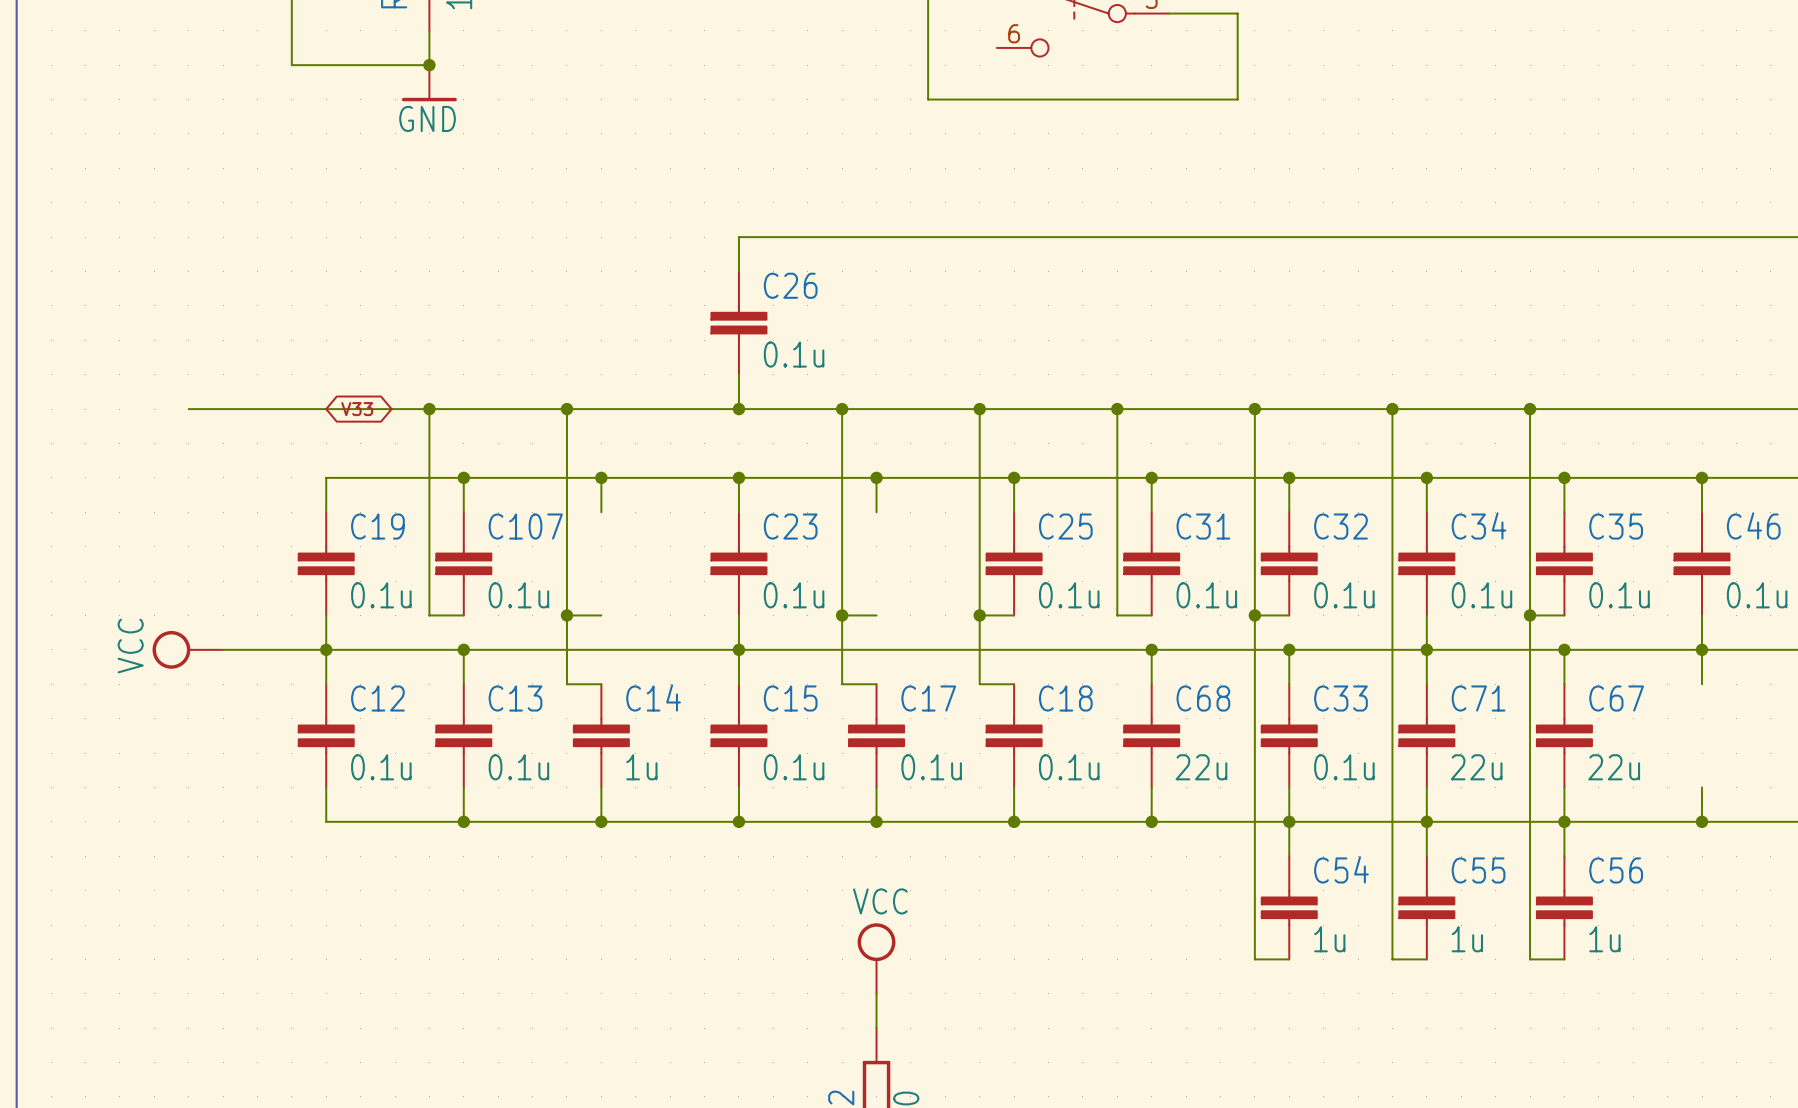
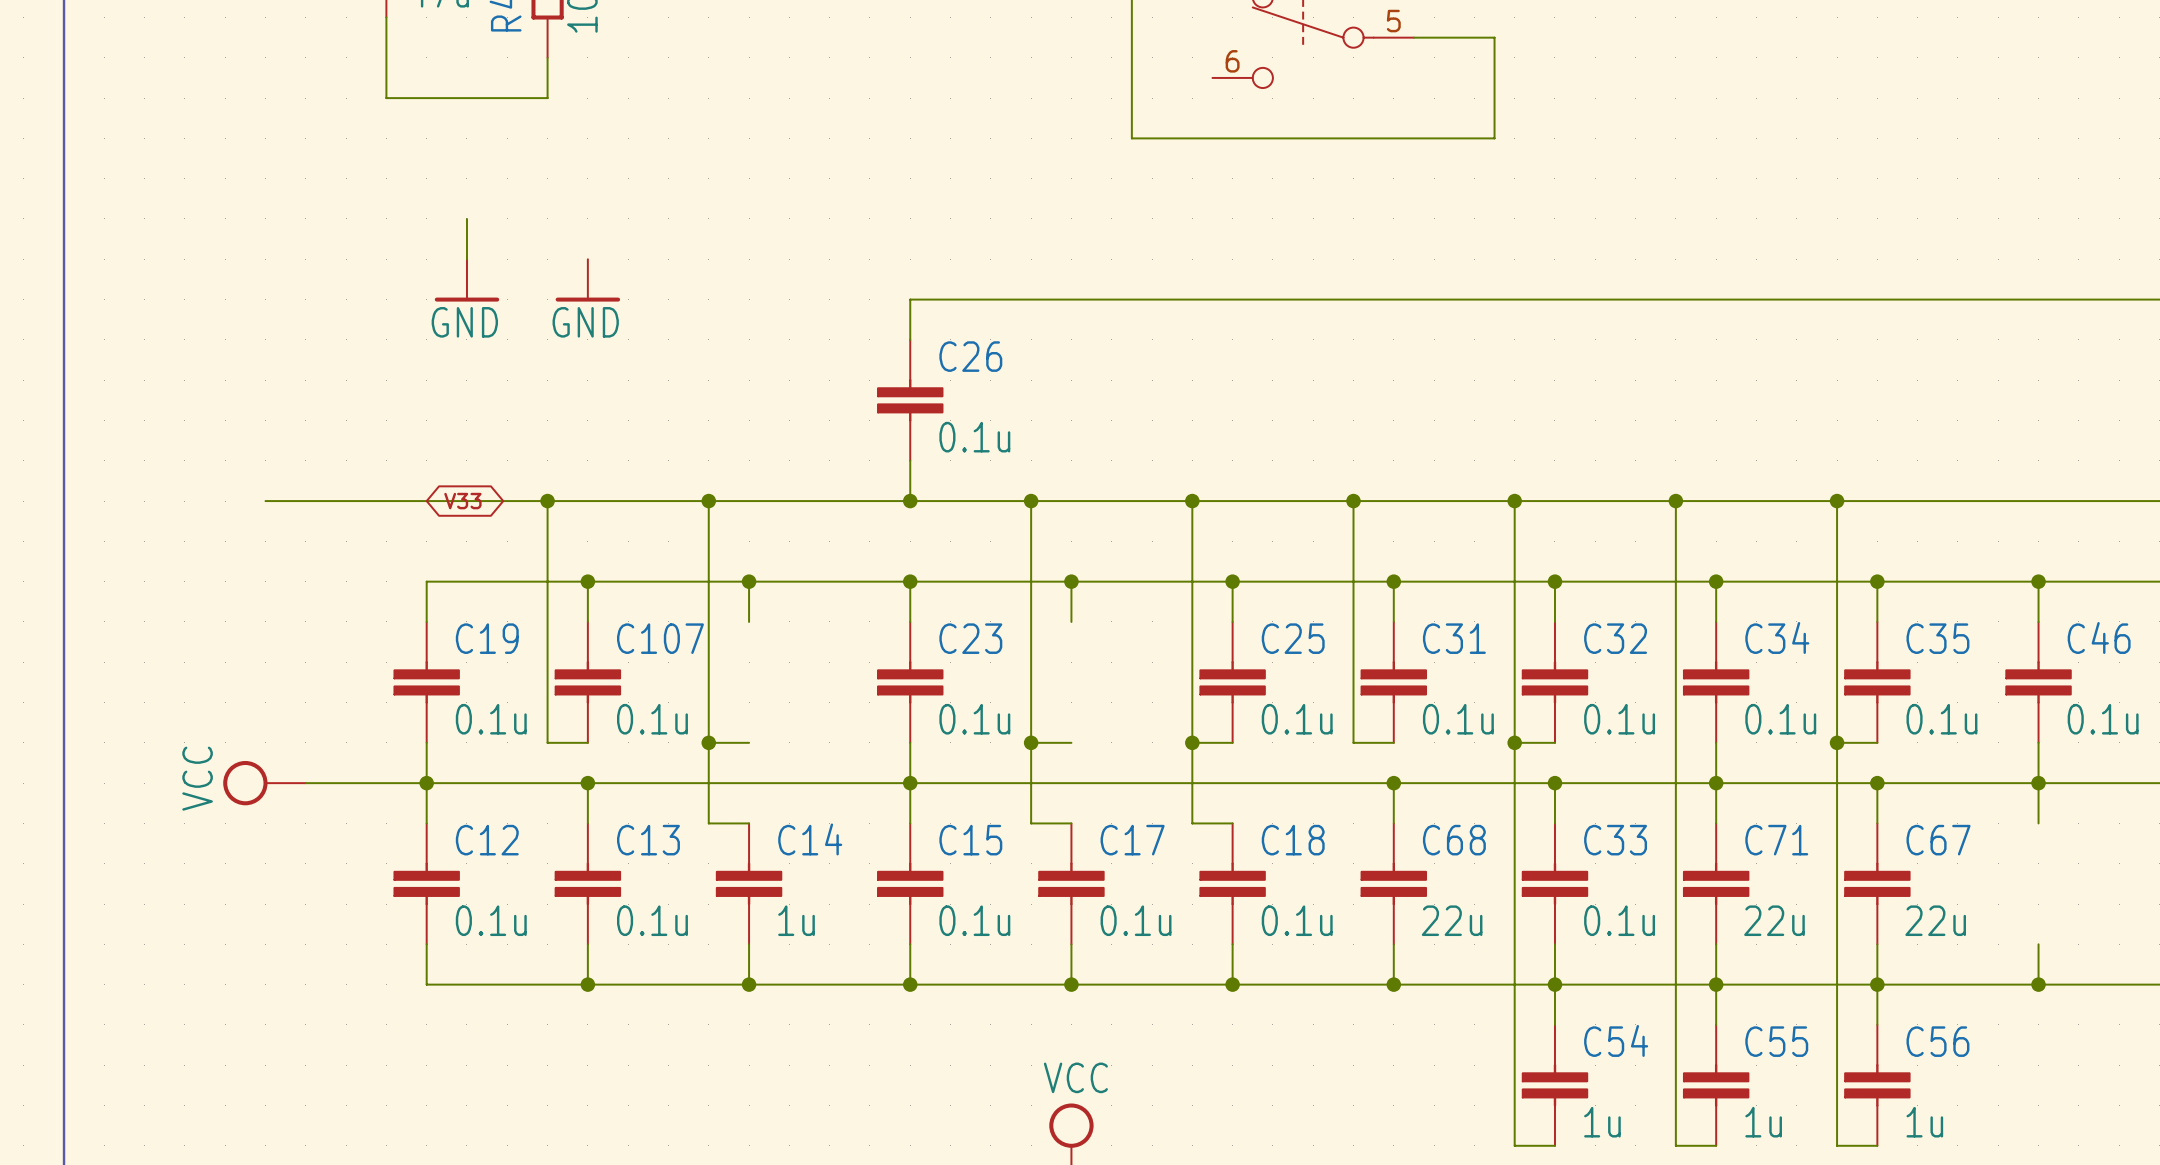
junction: (429, 65) -> none
power symbol: GND (429, 83) -> none
wire: none -> (466, 218) (466, 259)
power symbol: none -> GND (466, 280)
power symbol: none -> GND (587, 280)

